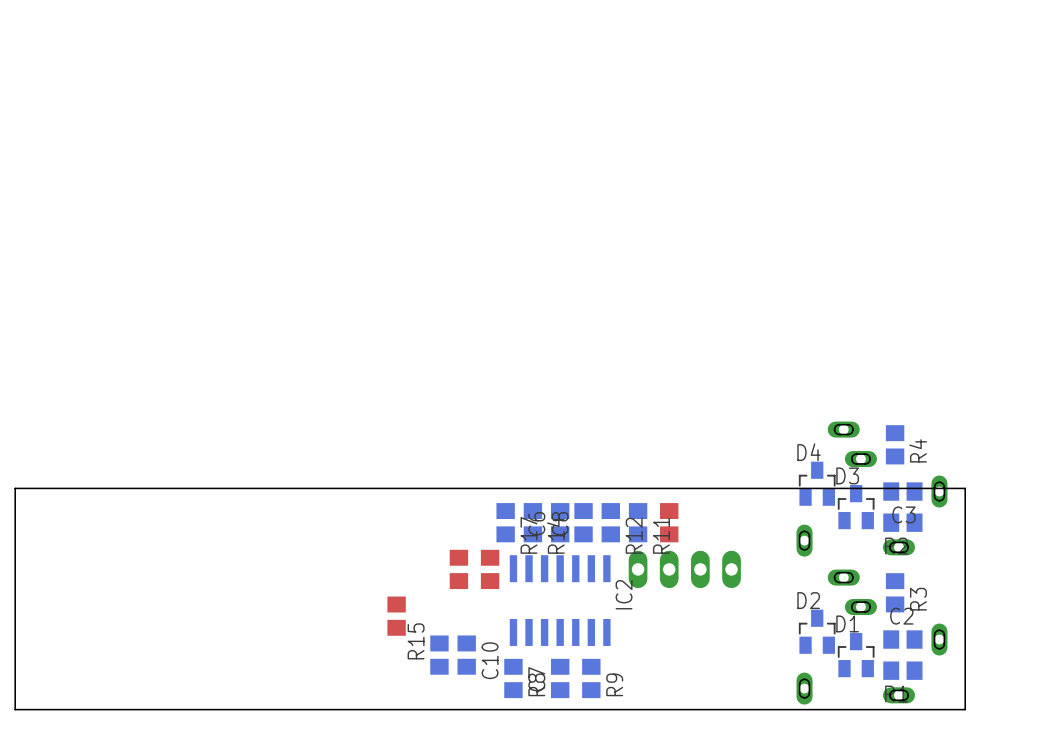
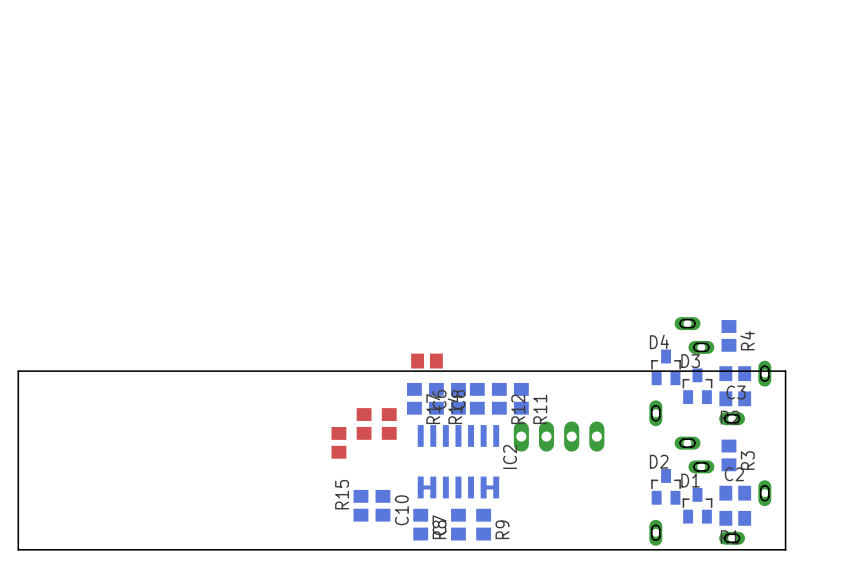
part: none -> (427, 361)
part: (669, 522) -> none
part: none -> (364, 423)
part: none -> (389, 423)
part: (458, 569) -> none
part: (490, 569) -> none
part: none -> (338, 442)
part: (396, 616) -> none
bottom track: none -> (433, 487) (420, 487)
bottom track: none -> (496, 487) (483, 487)

